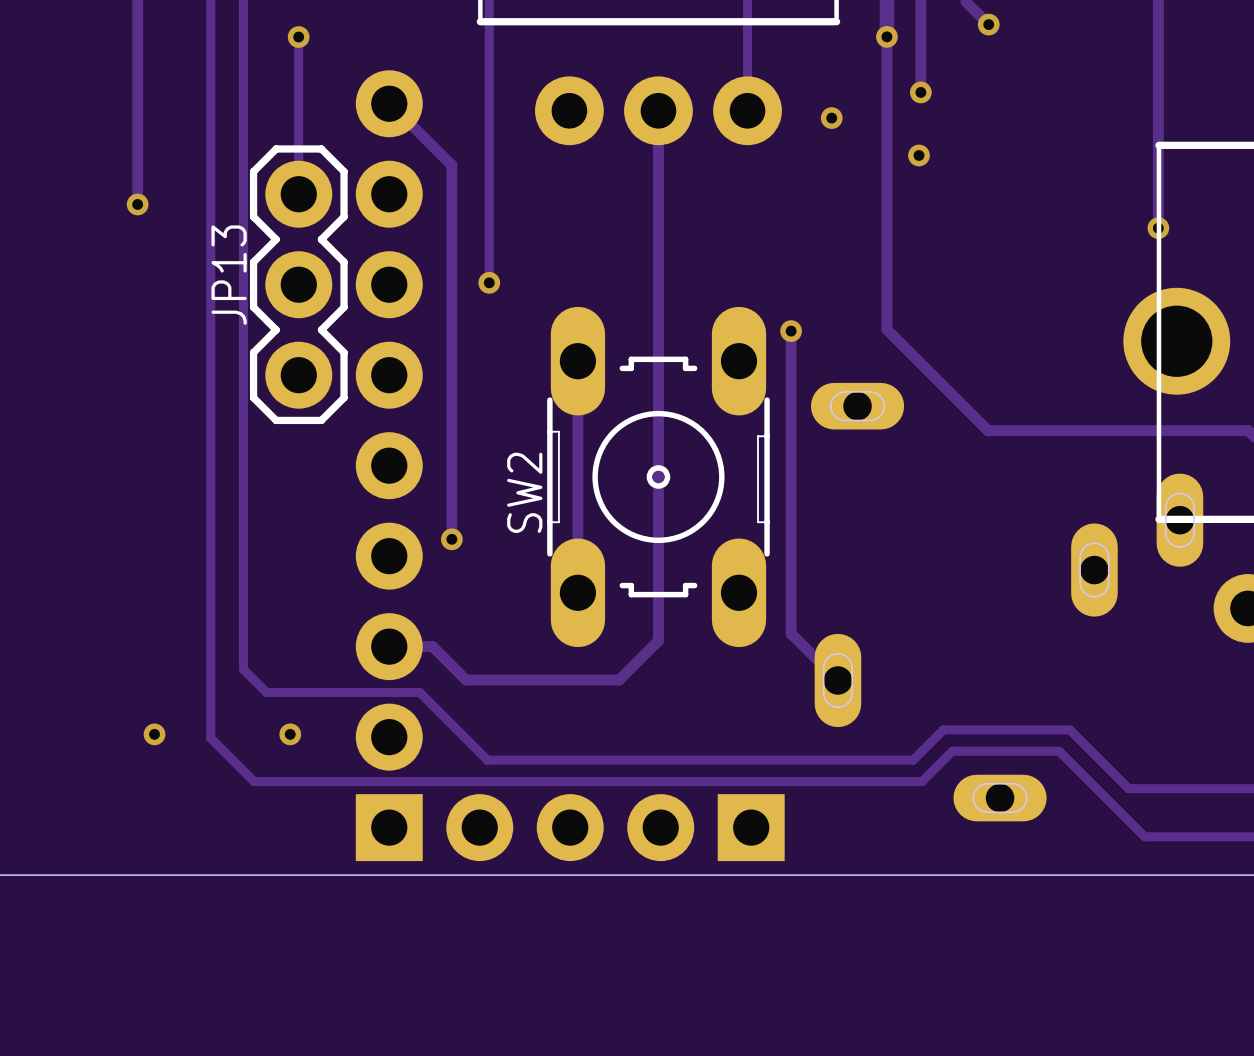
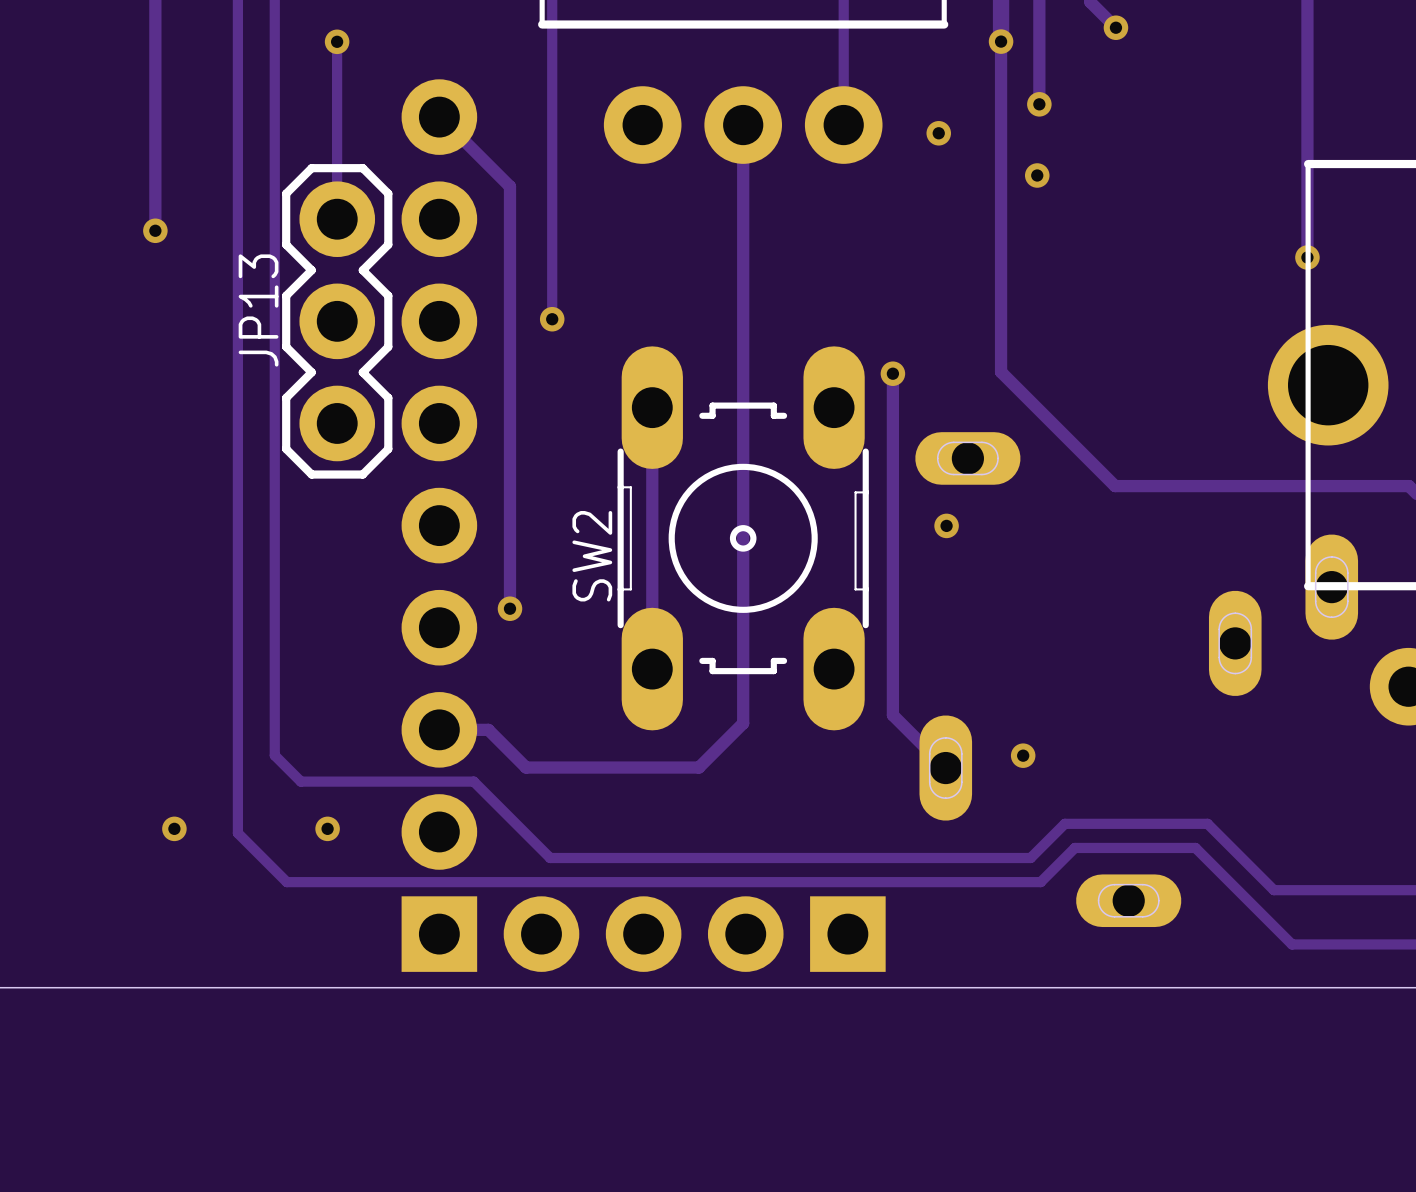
via: none -> (946, 525)
via: none -> (1023, 755)

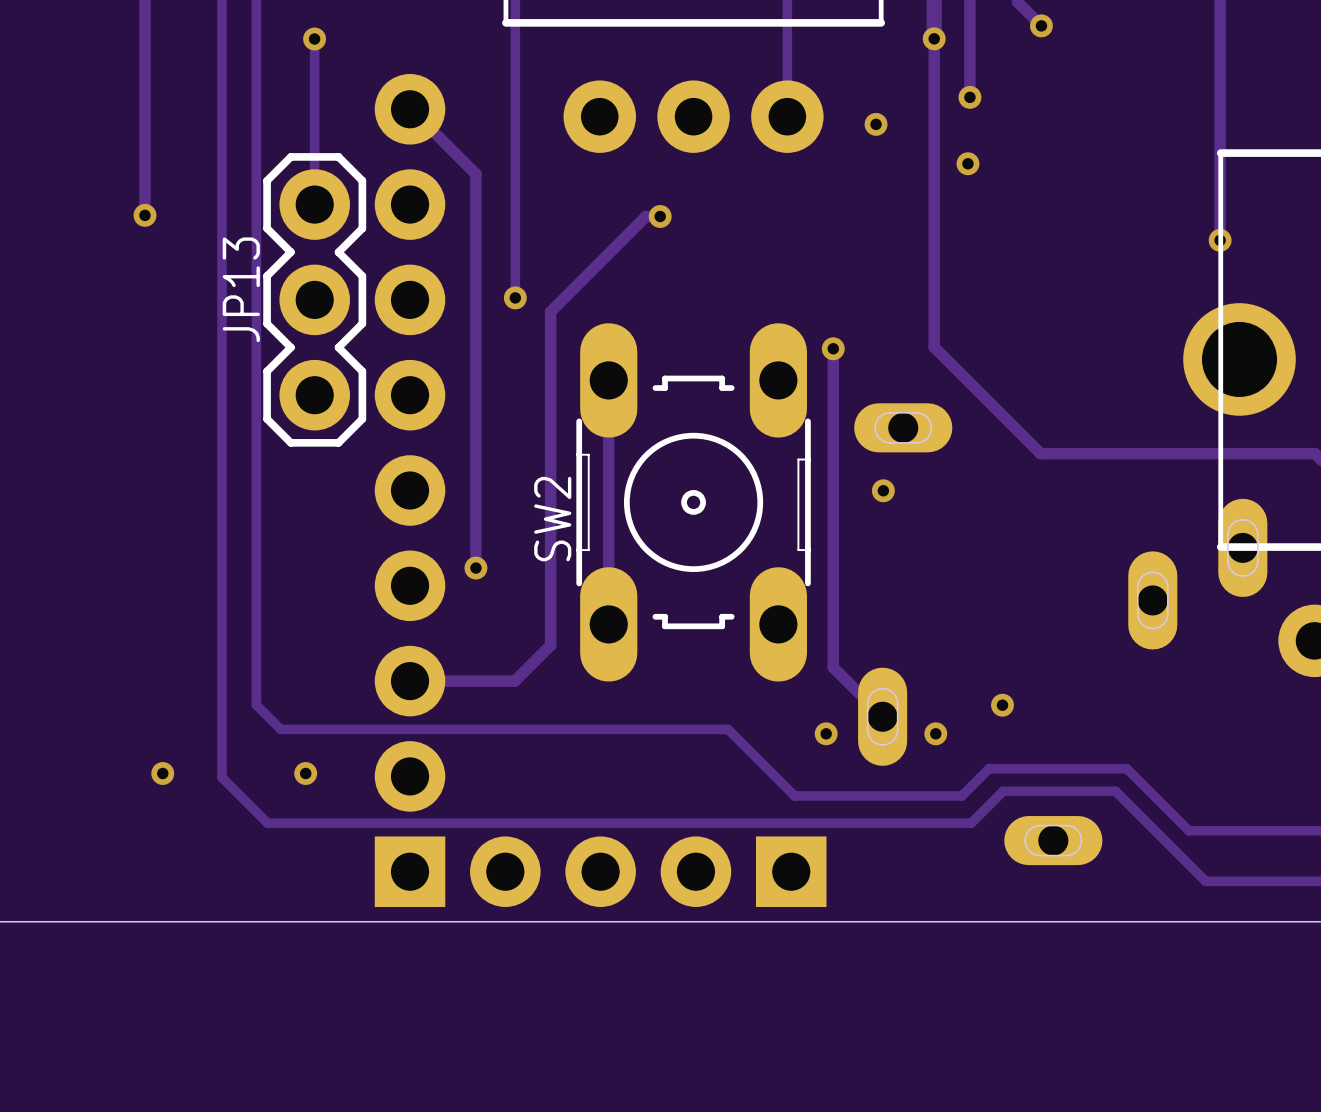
track: (743, 125) (743, 723) (698, 767) (526, 767) (488, 729) -> (660, 216) (645, 216) (550, 311) (550, 645) (514, 681) (455, 681)
via: none -> (660, 216)
via: (1023, 755) -> none
via: none -> (1002, 705)
track: (473, 781) (550, 858) (1030, 858) (1064, 823) -> (442, 729) (728, 729) (794, 795) (961, 795) (988, 768) (993, 768)
via: none -> (826, 733)
via: none -> (935, 733)

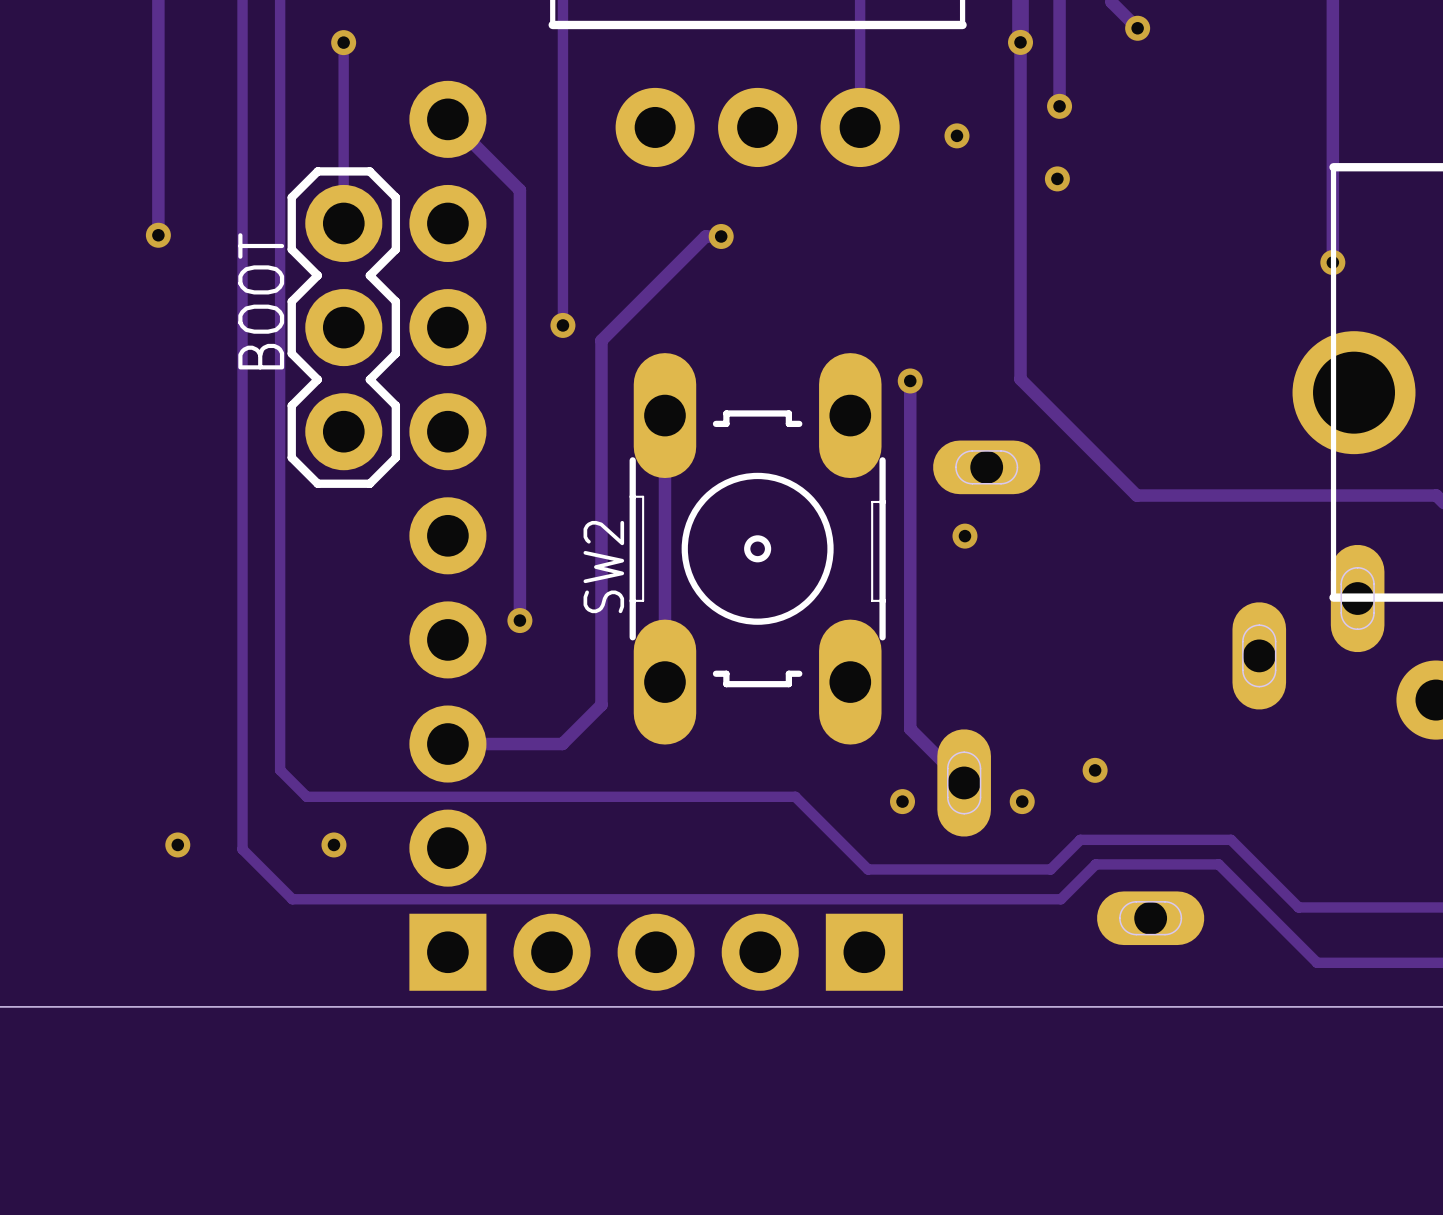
JP13 name: JP13 (241, 289) -> BOOT (261, 301)

